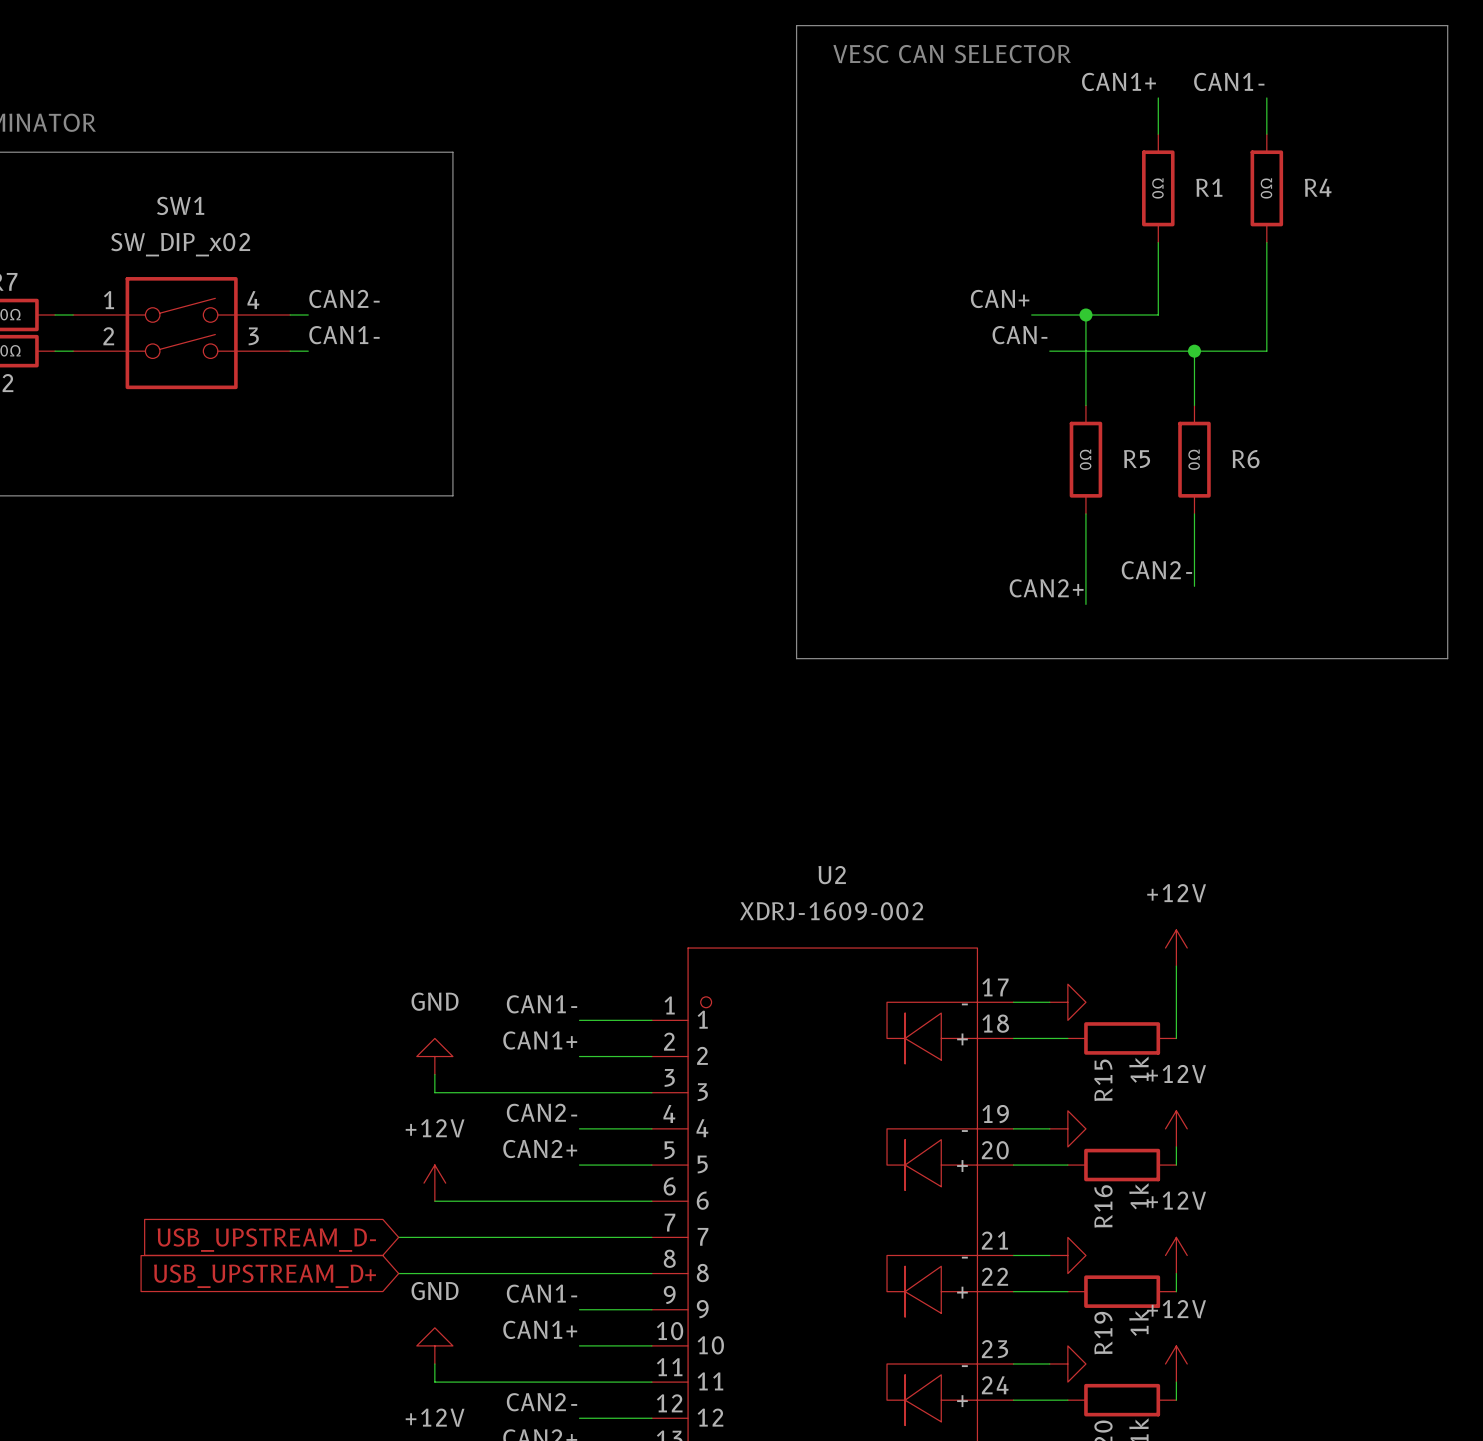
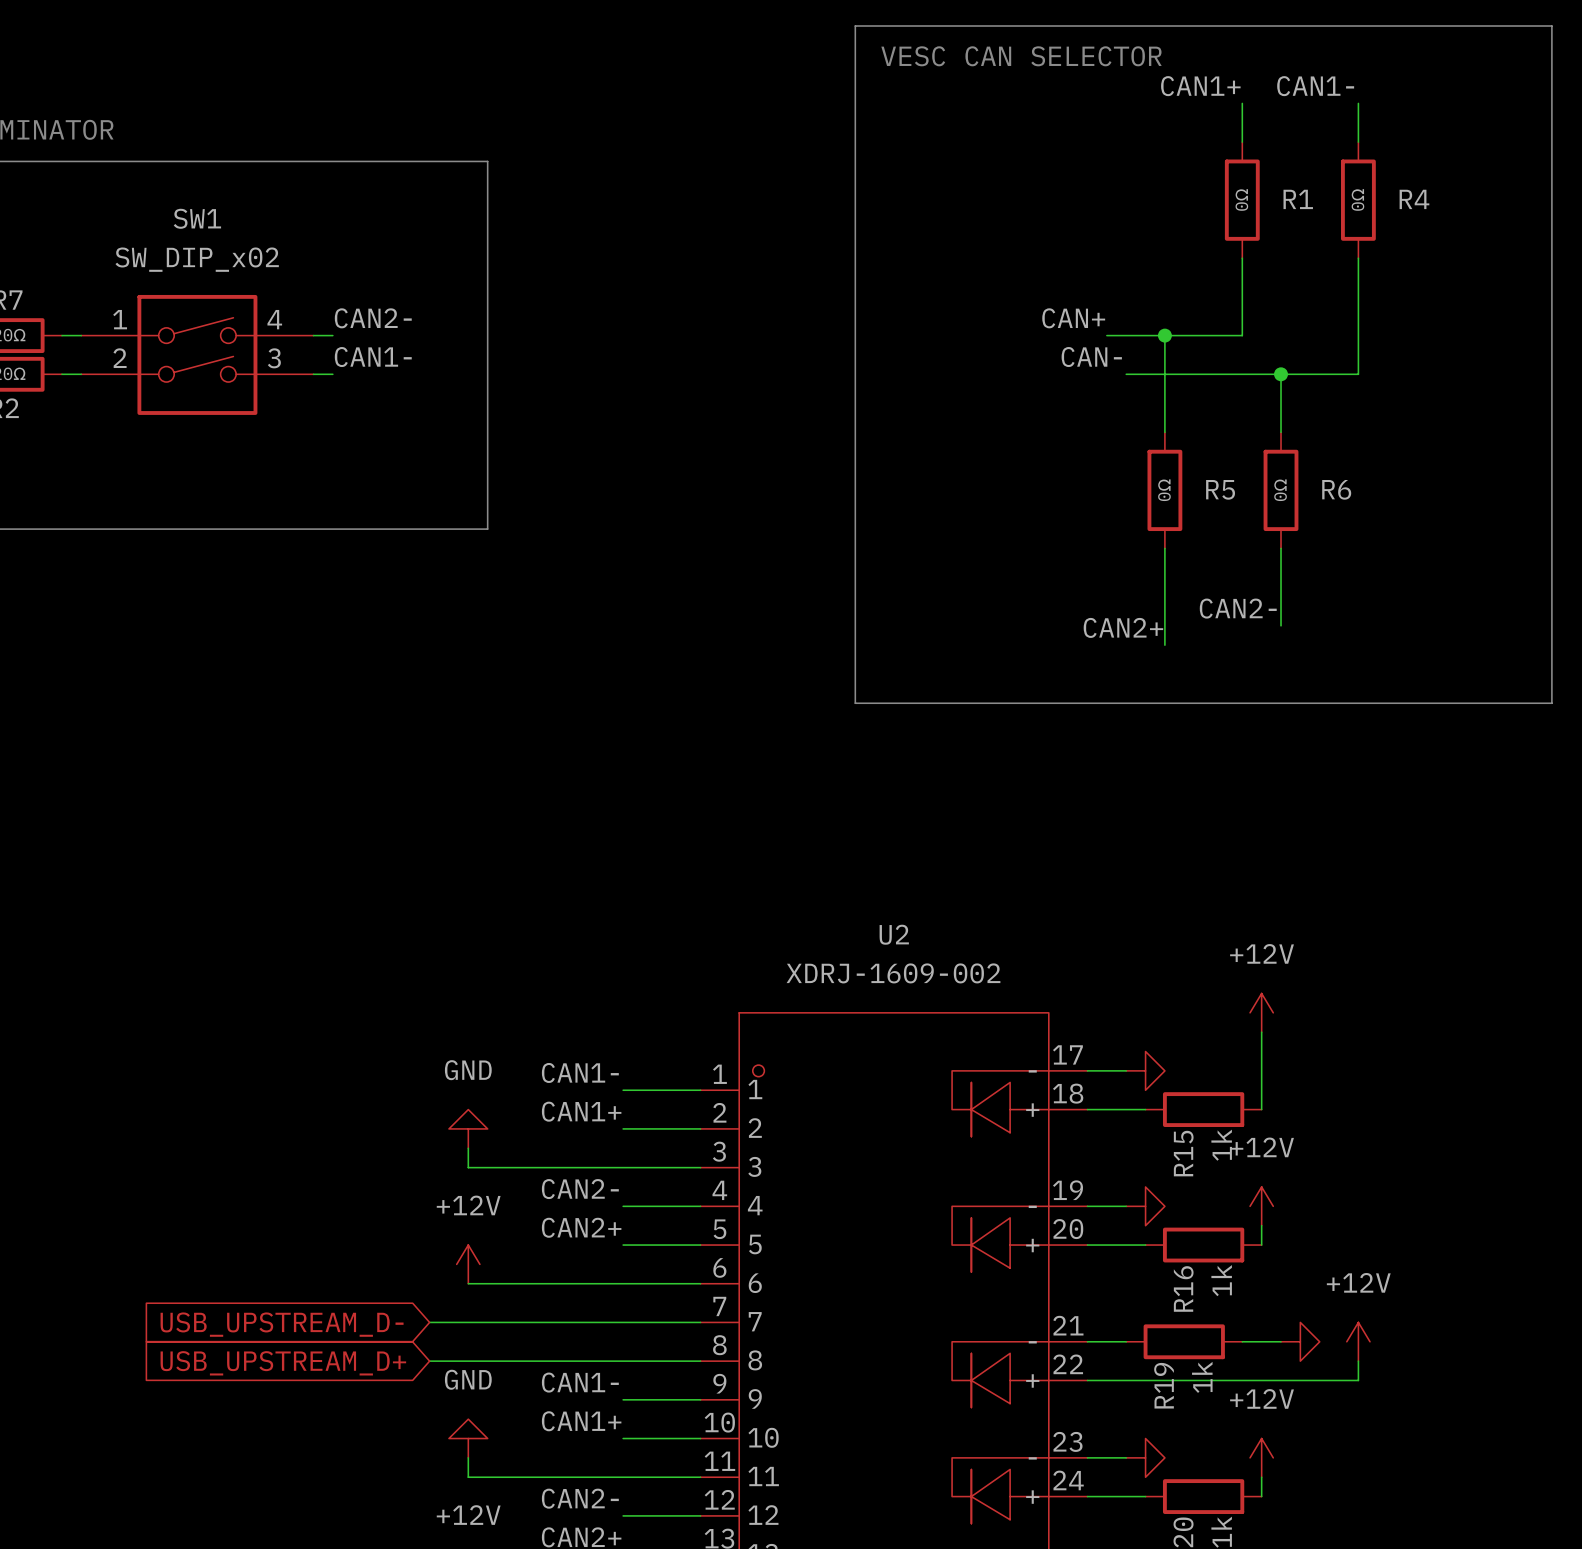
power symbol position: (1067, 1255) -> (1300, 1341)
wire: none -> (1242, 1341) (1281, 1341)
power symbol position: +12V (1176, 1255) -> +12V (1358, 1341)
wire: (1176, 1273) (1176, 1291) -> none
wire: none -> (1358, 1361) (1358, 1380) (1145, 1380)
R19 position: (1122, 1291) -> (1184, 1341)

